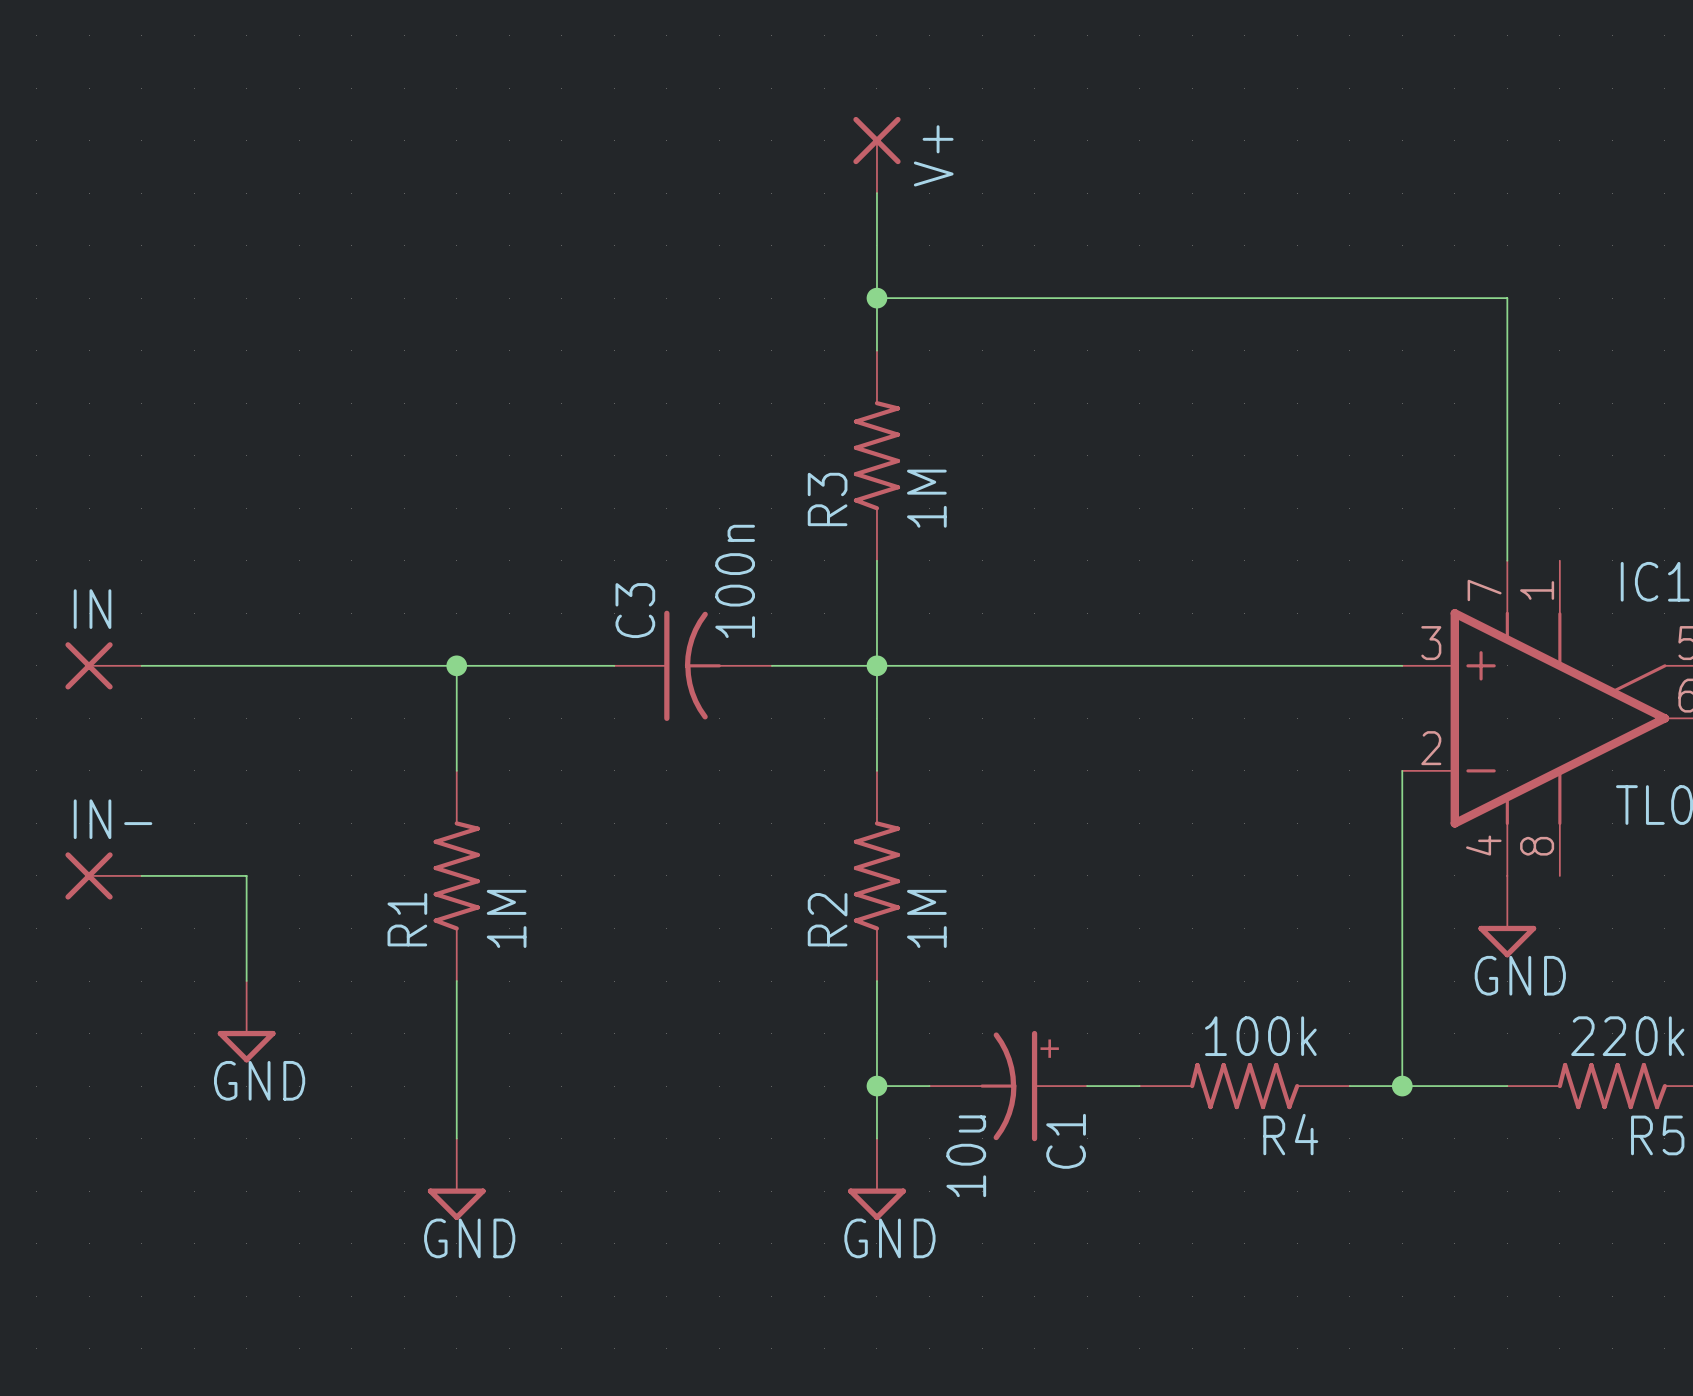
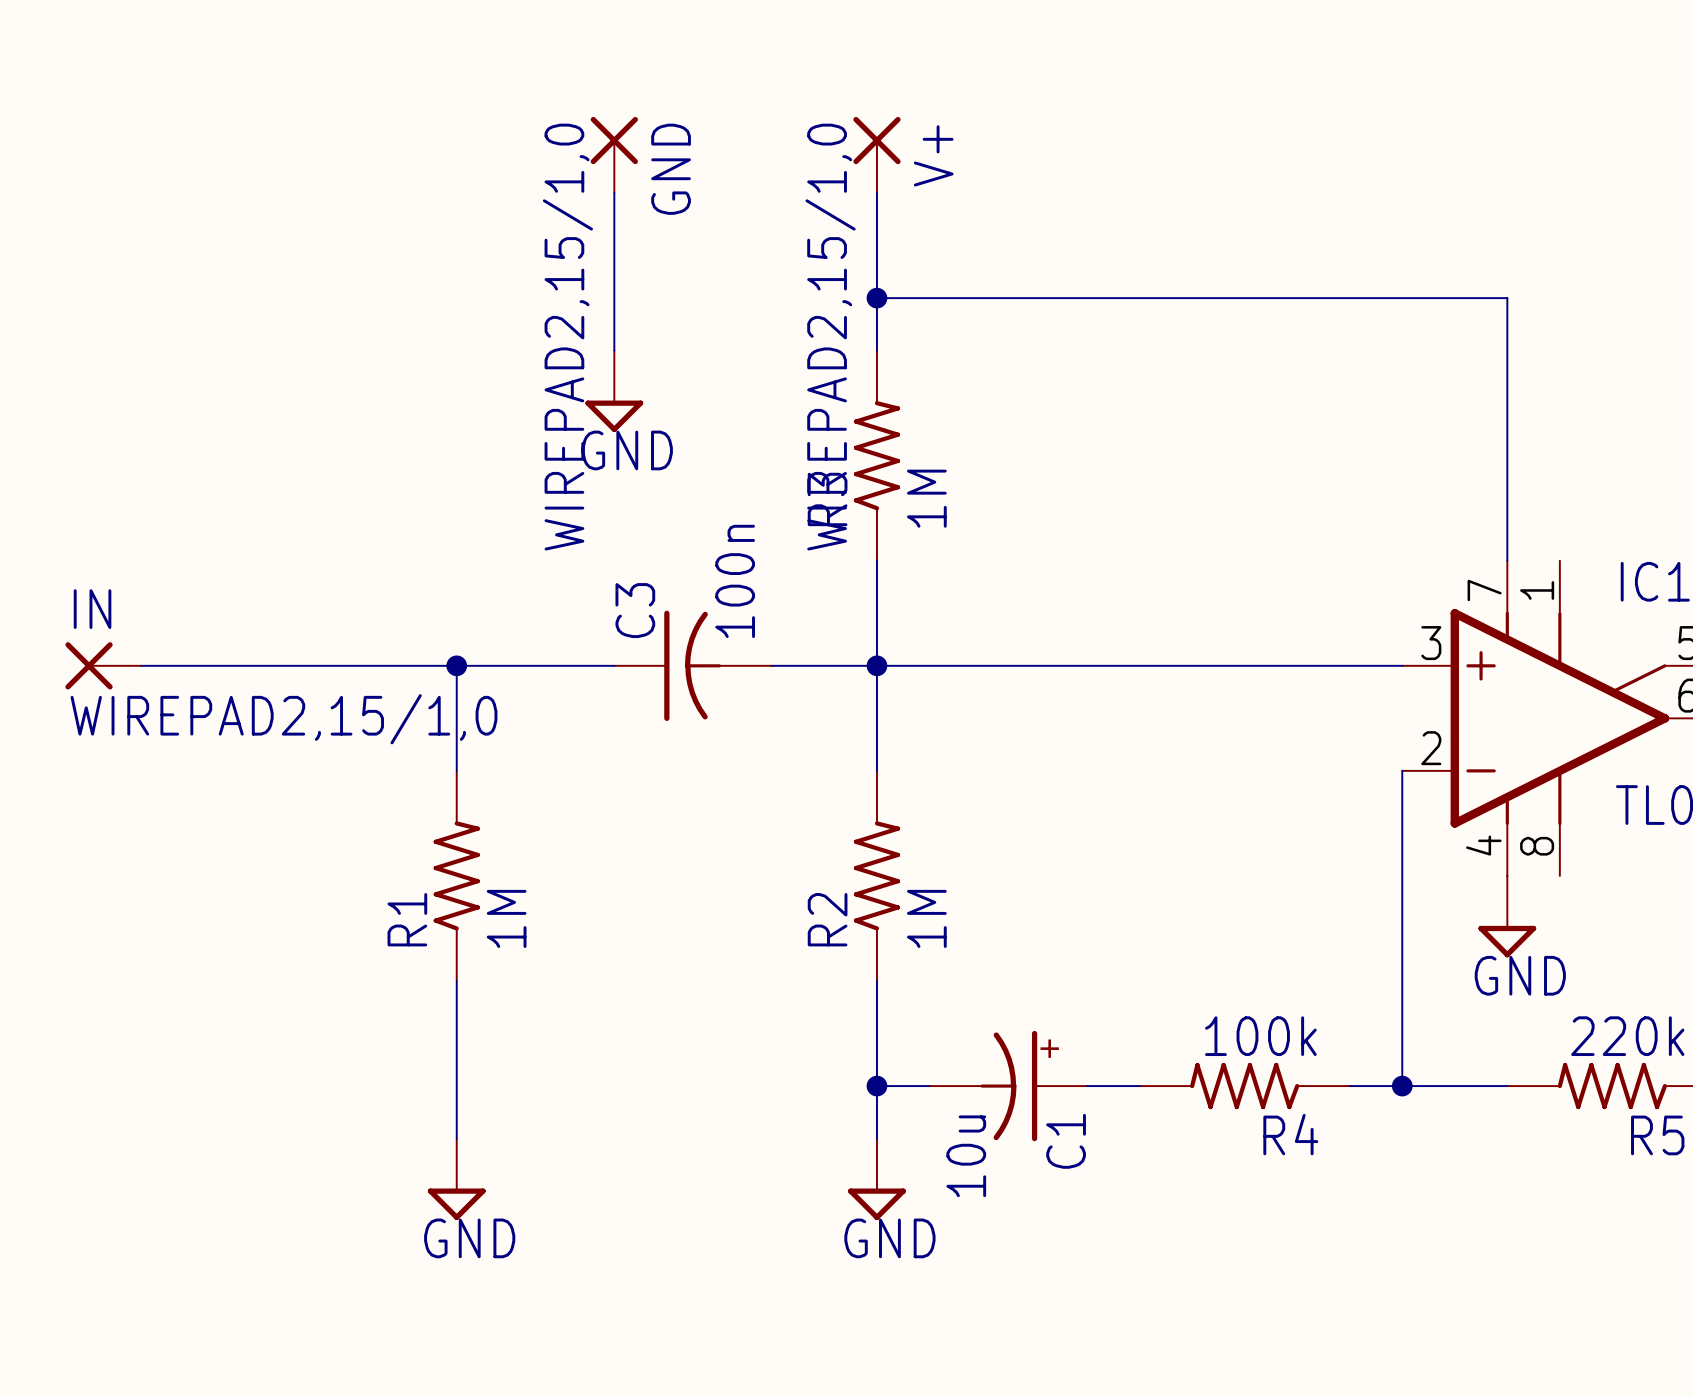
GND: none -> WIREPAD2,15/1,0 (614, 154)
wire: none -> (614, 193) (614, 350)
V+ value: none -> WIREPAD2,15/1,0 (830, 337)
power symbol: none -> GND (614, 391)
IN value: none -> WIREPAD2,15/1,0 (284, 719)
IN-: (103, 875) -> none
wire: (141, 875) (246, 875) (246, 981) -> none
power symbol: GND (246, 1021) -> none

